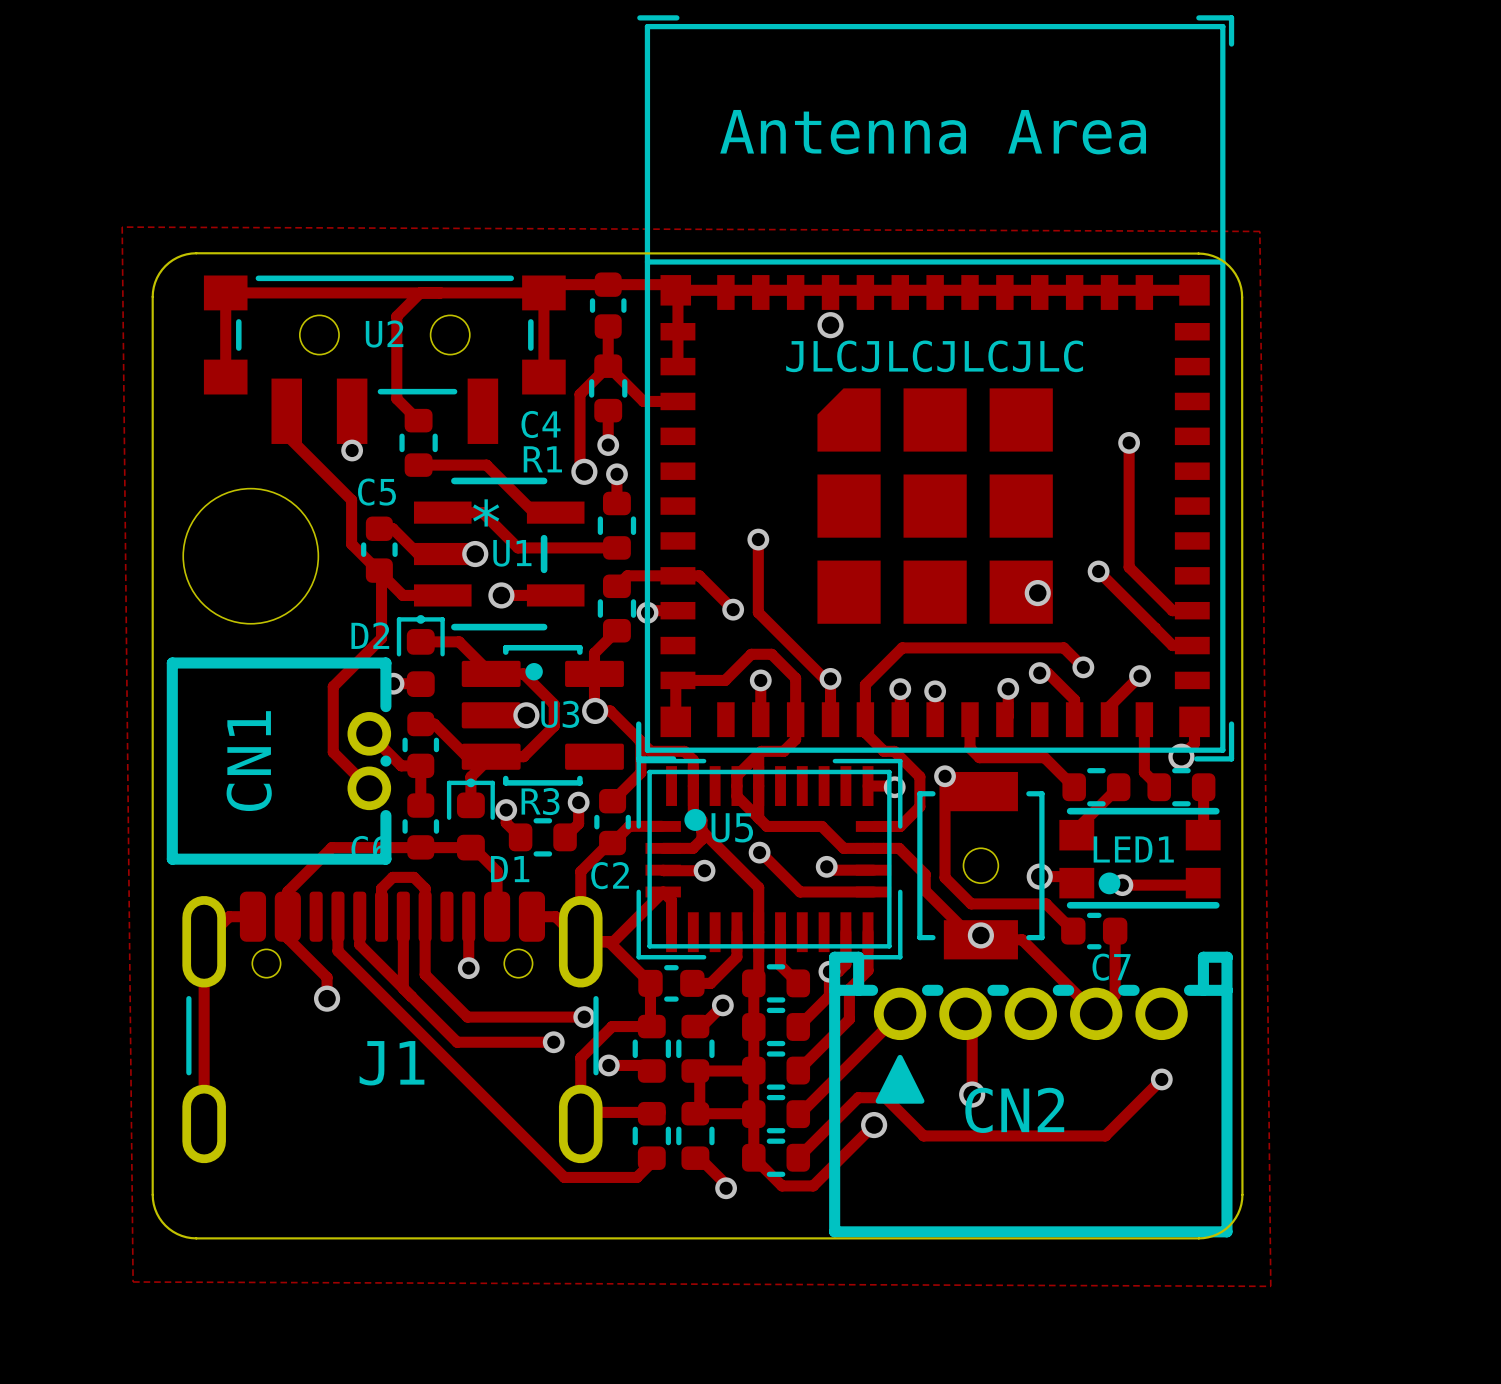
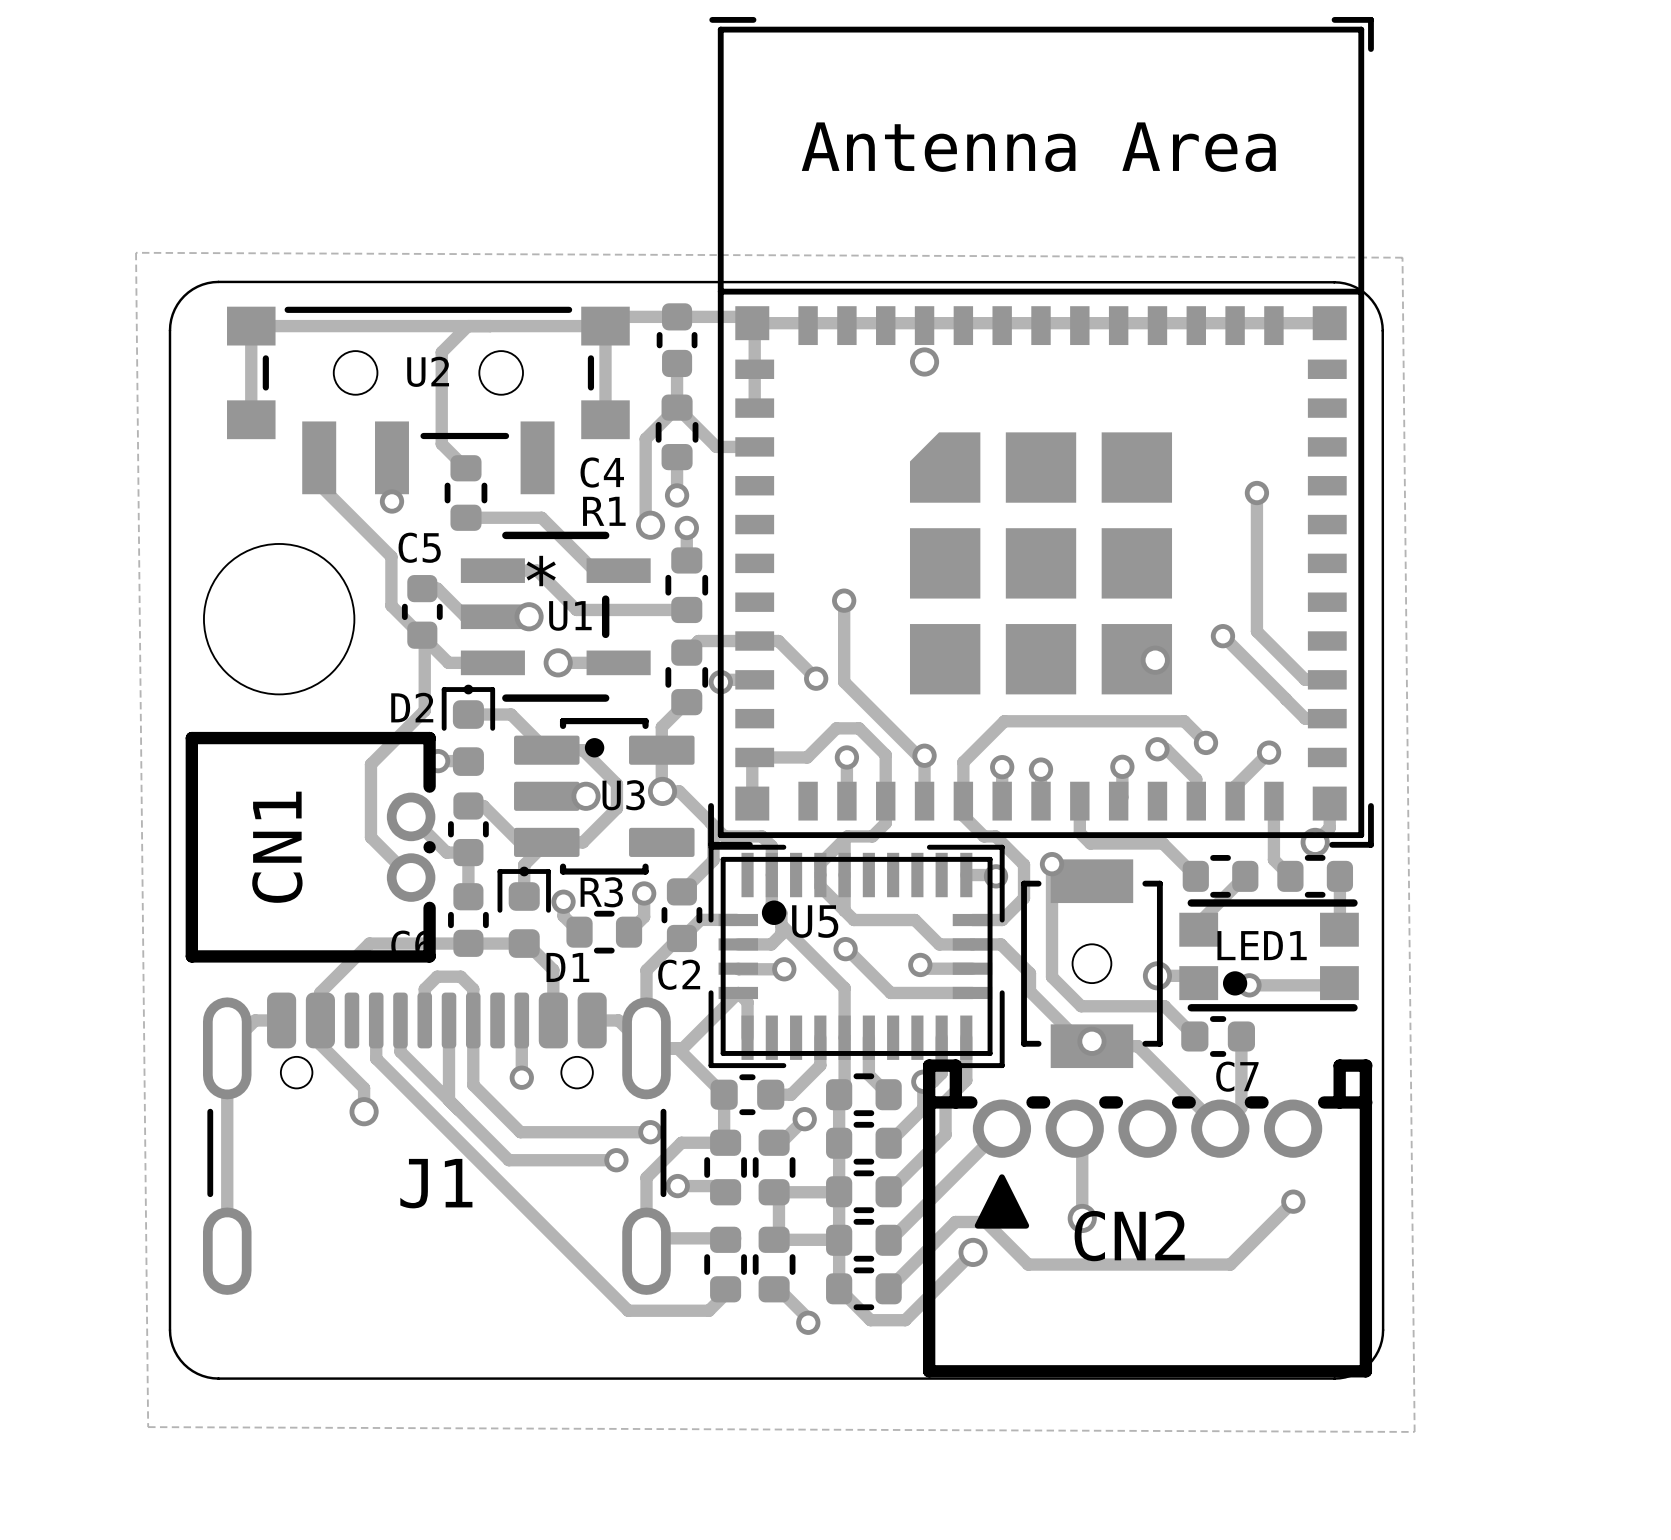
text: JLCJLCJLCJLC (934, 356) -> none

